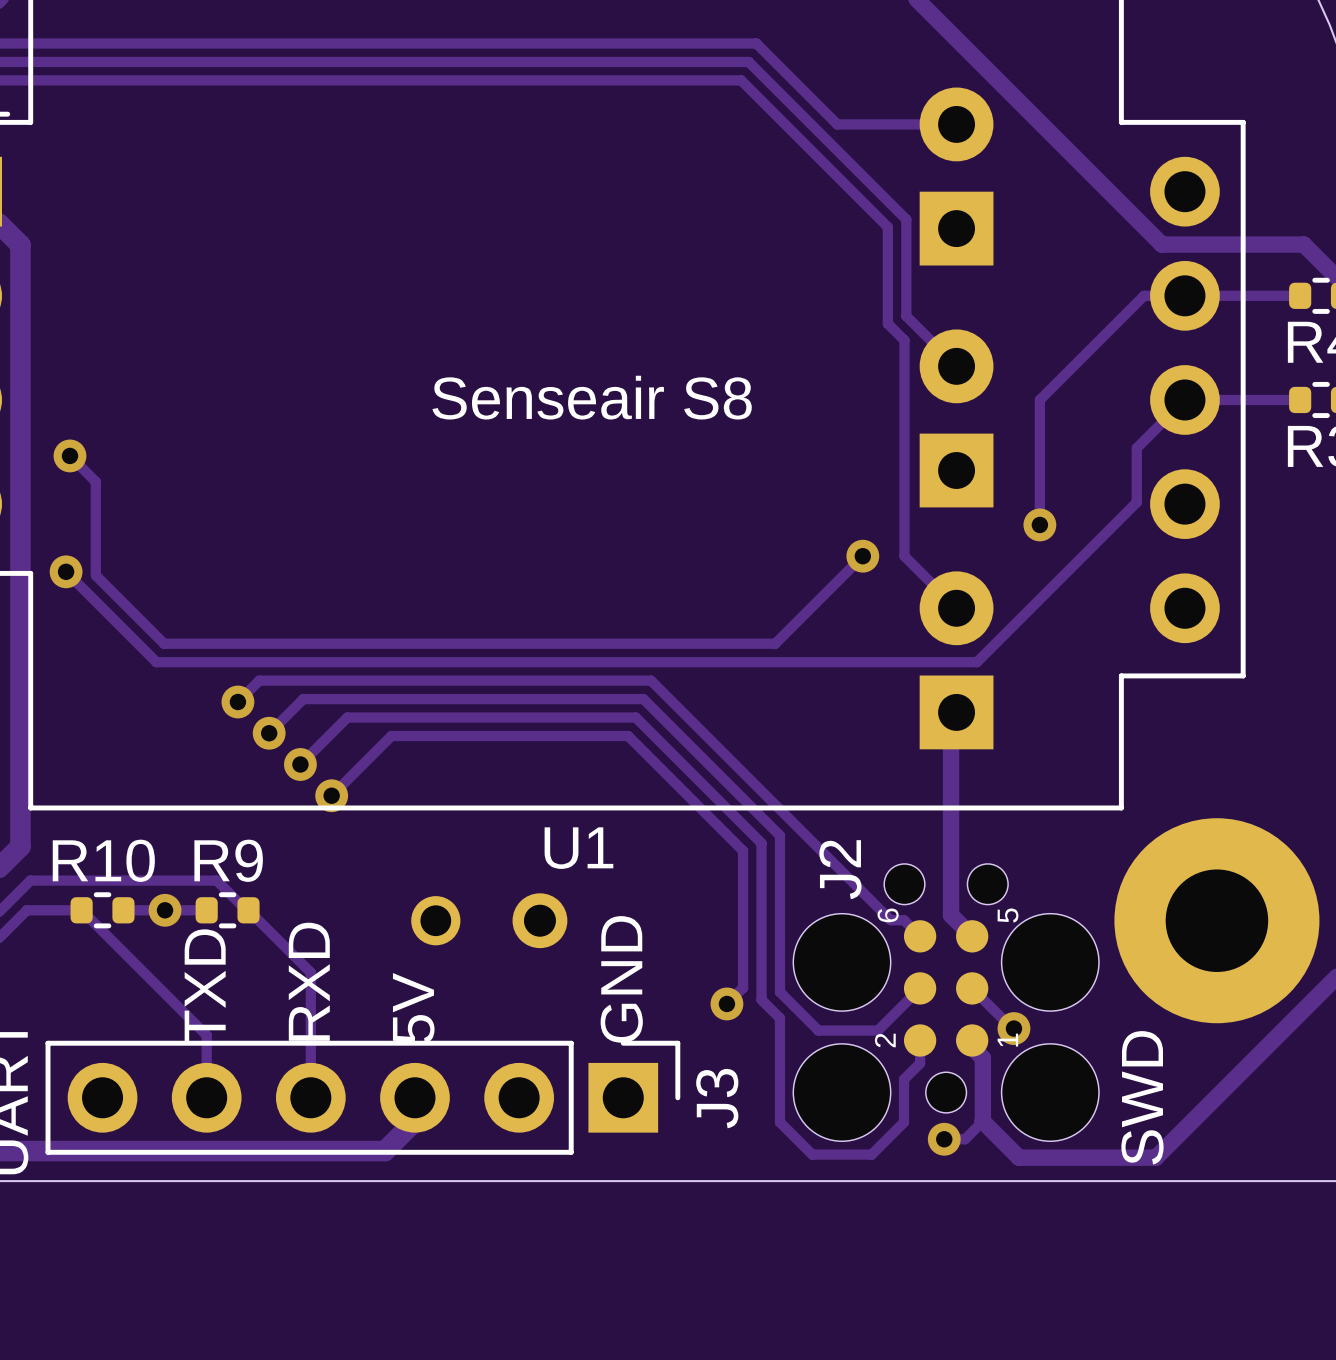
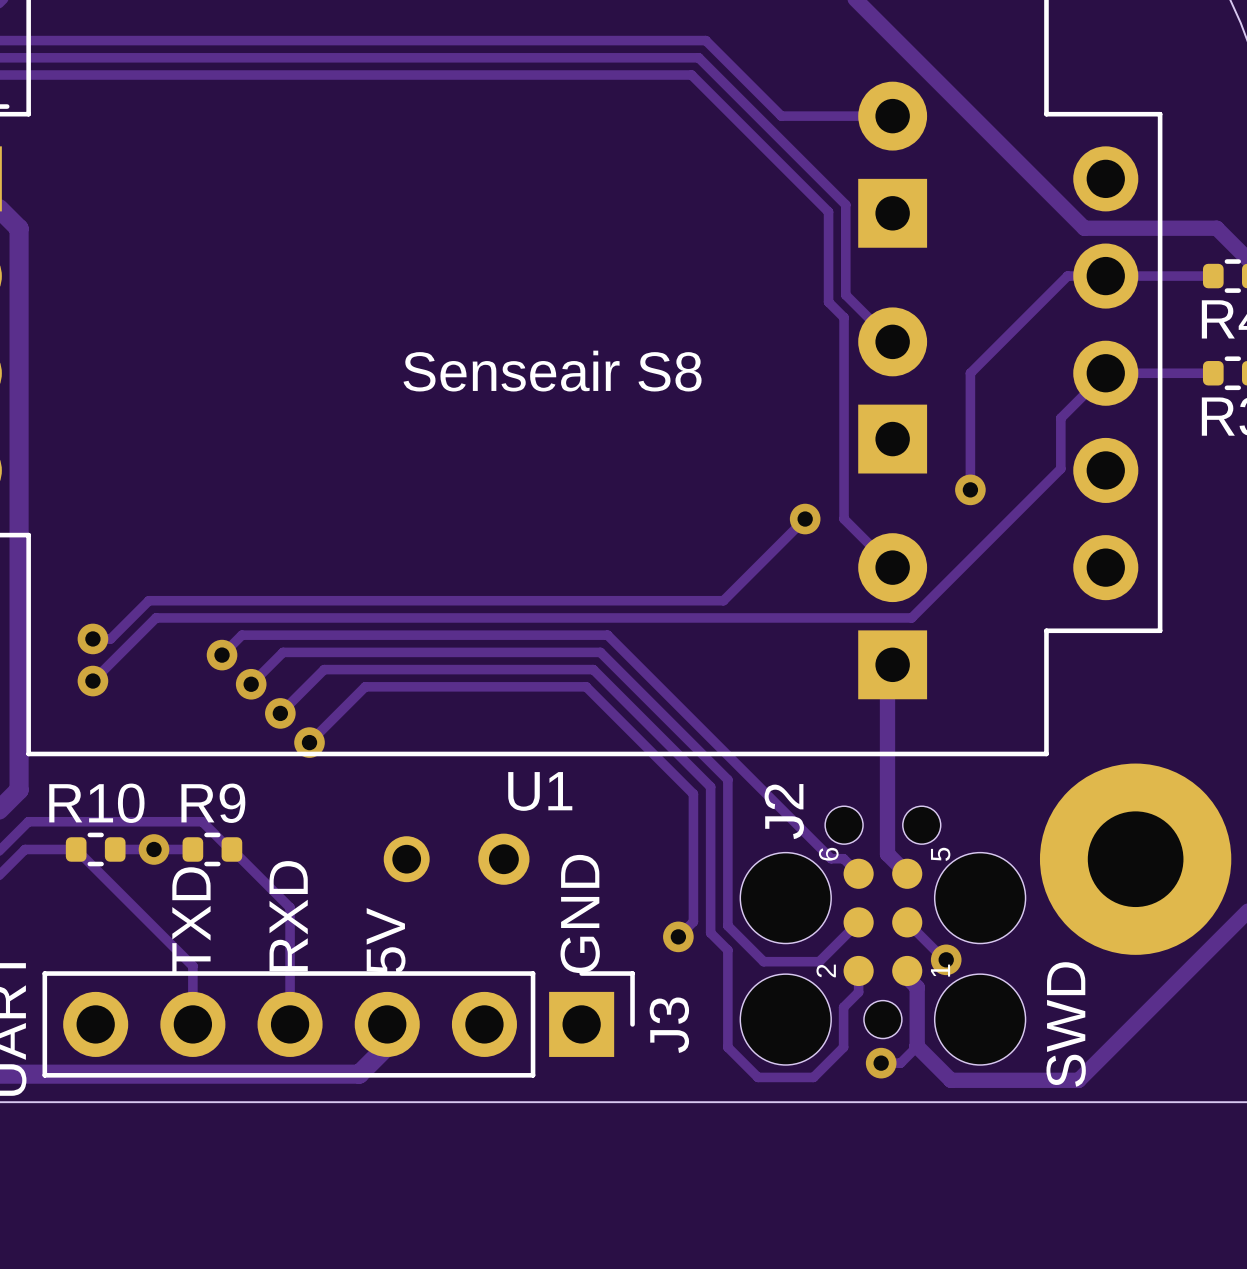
track: (69, 455) (95, 481) (95, 575) (164, 643) -> (92, 638) (110, 638) (148, 600) (153, 600)
via: (69, 455) -> none
track: (66, 571) (156, 662) (167, 662) -> (92, 681) (156, 617)
via: (66, 571) -> none
via: none -> (92, 638)
via: none -> (92, 681)

